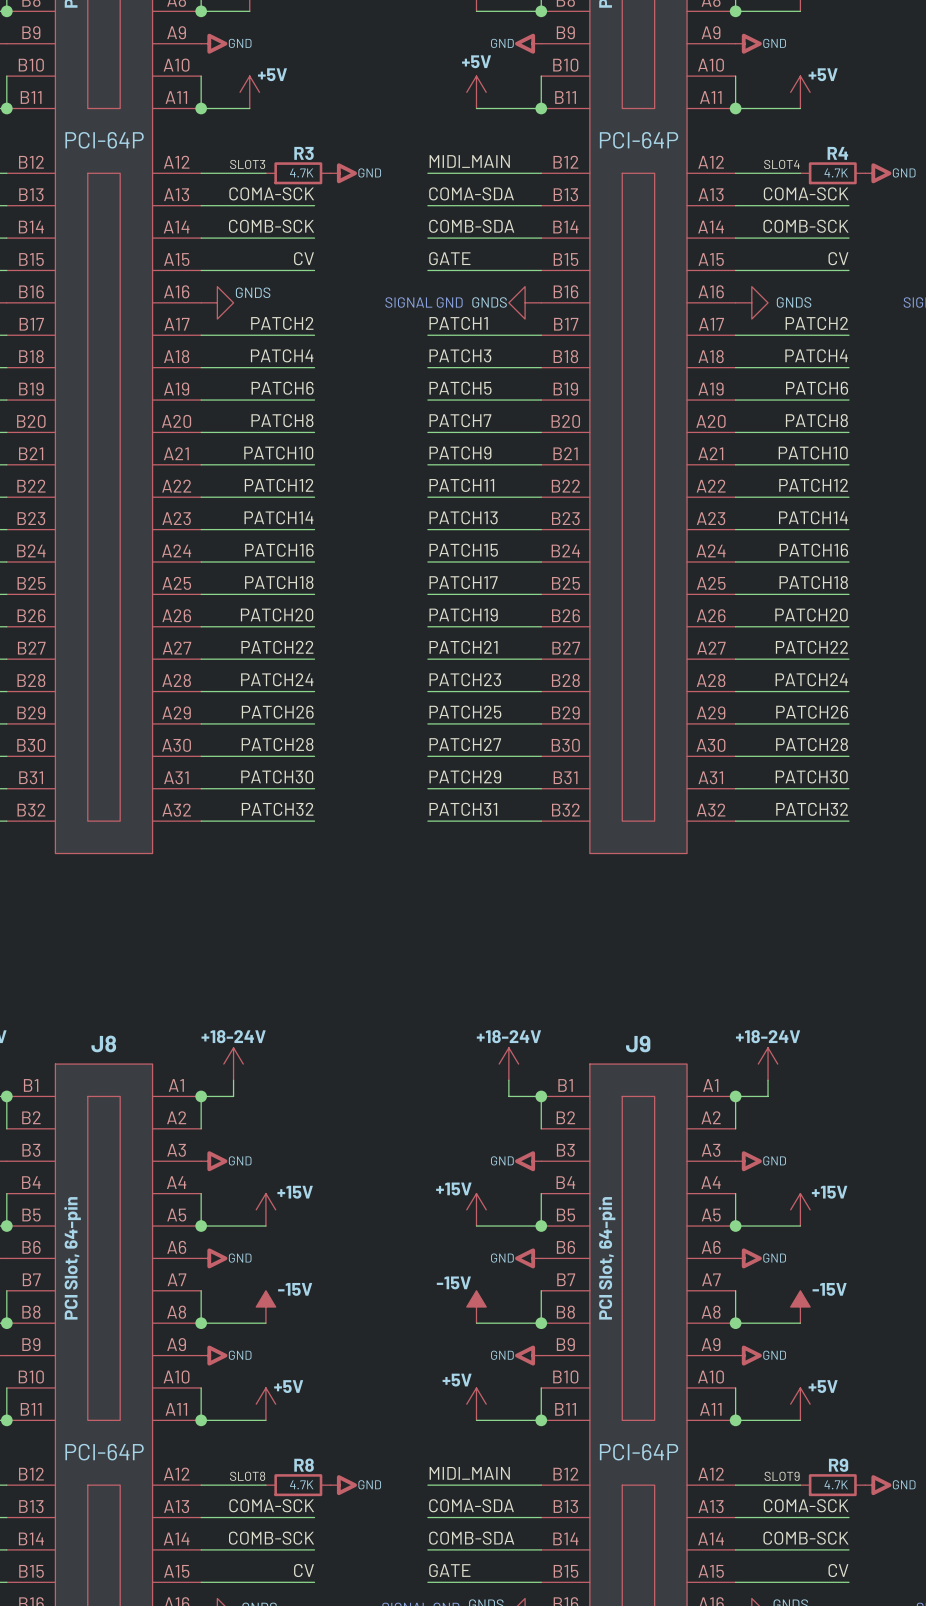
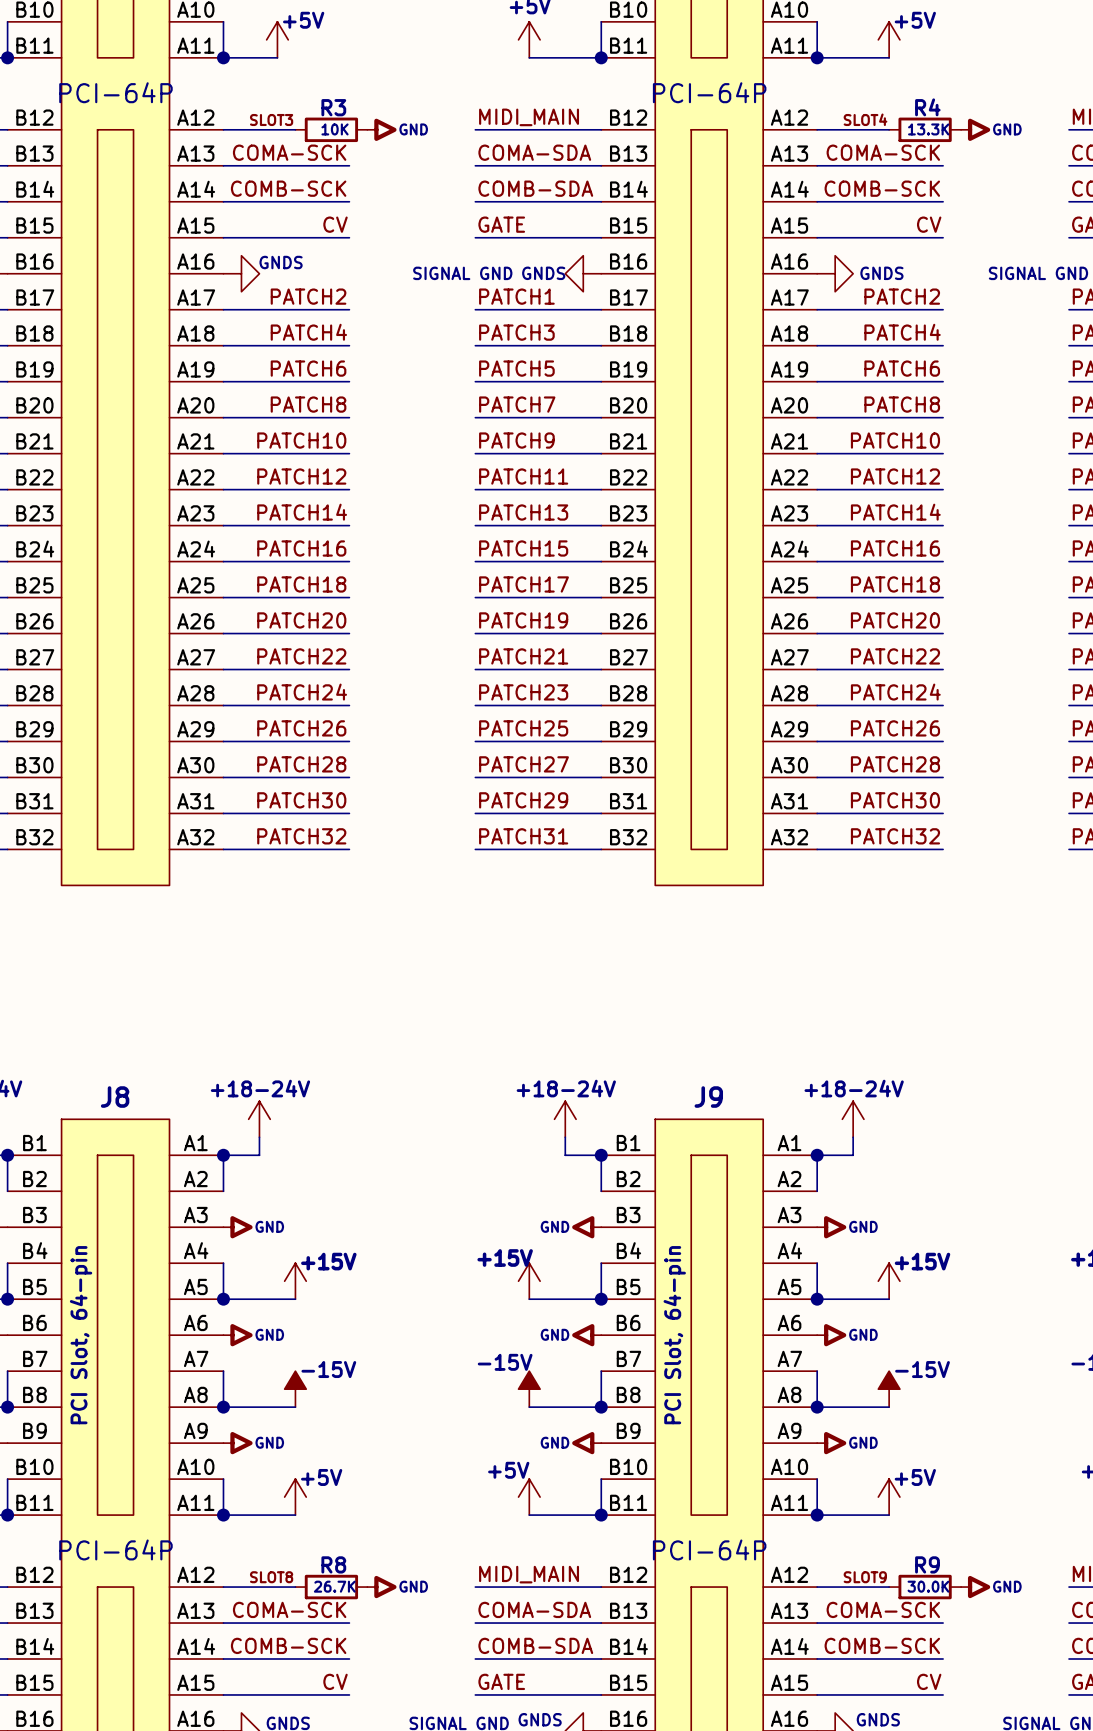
R3 value: 4.7K (301, 172) -> 10K (335, 129)
R4 value: 4.7K (836, 172) -> 13.3K (928, 129)
R8 value: 4.7K (301, 1484) -> 26.7K (334, 1586)
R9 value: 4.7K (836, 1484) -> 30.0K (928, 1586)

